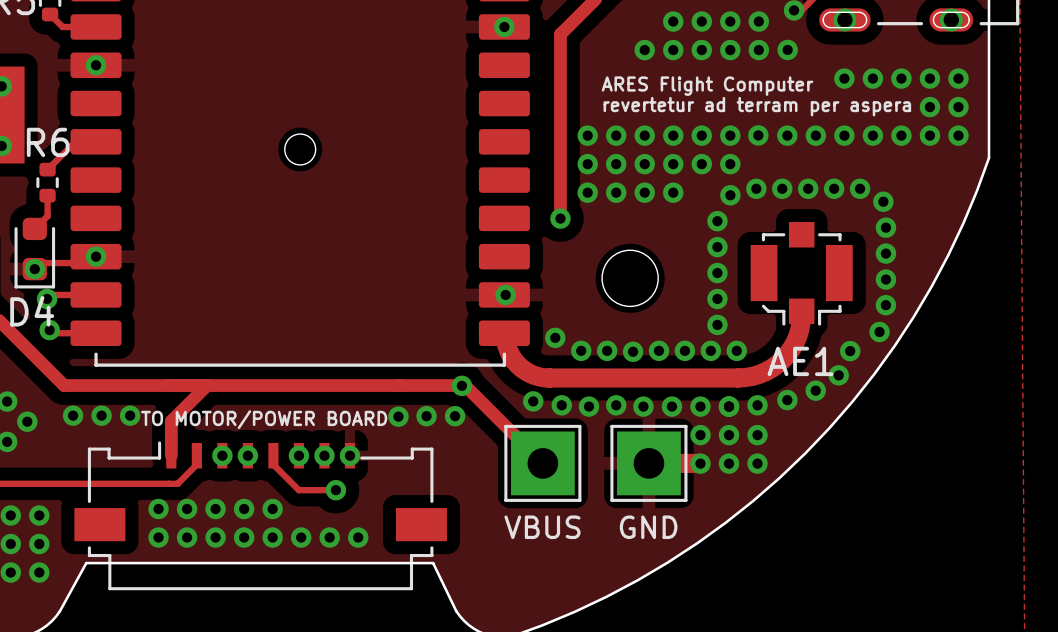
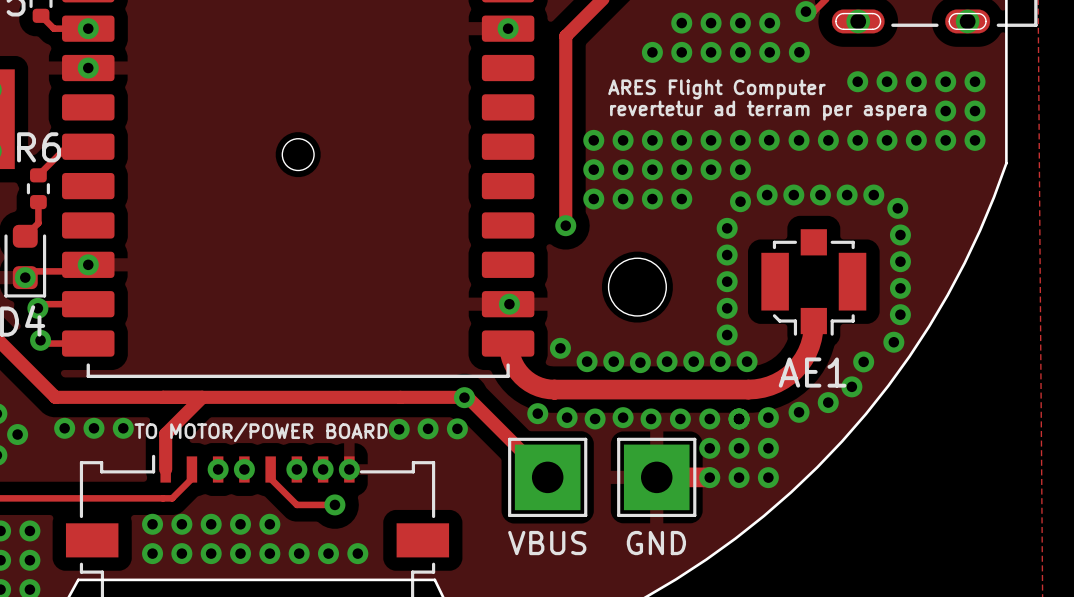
via: none -> (88, 28)

